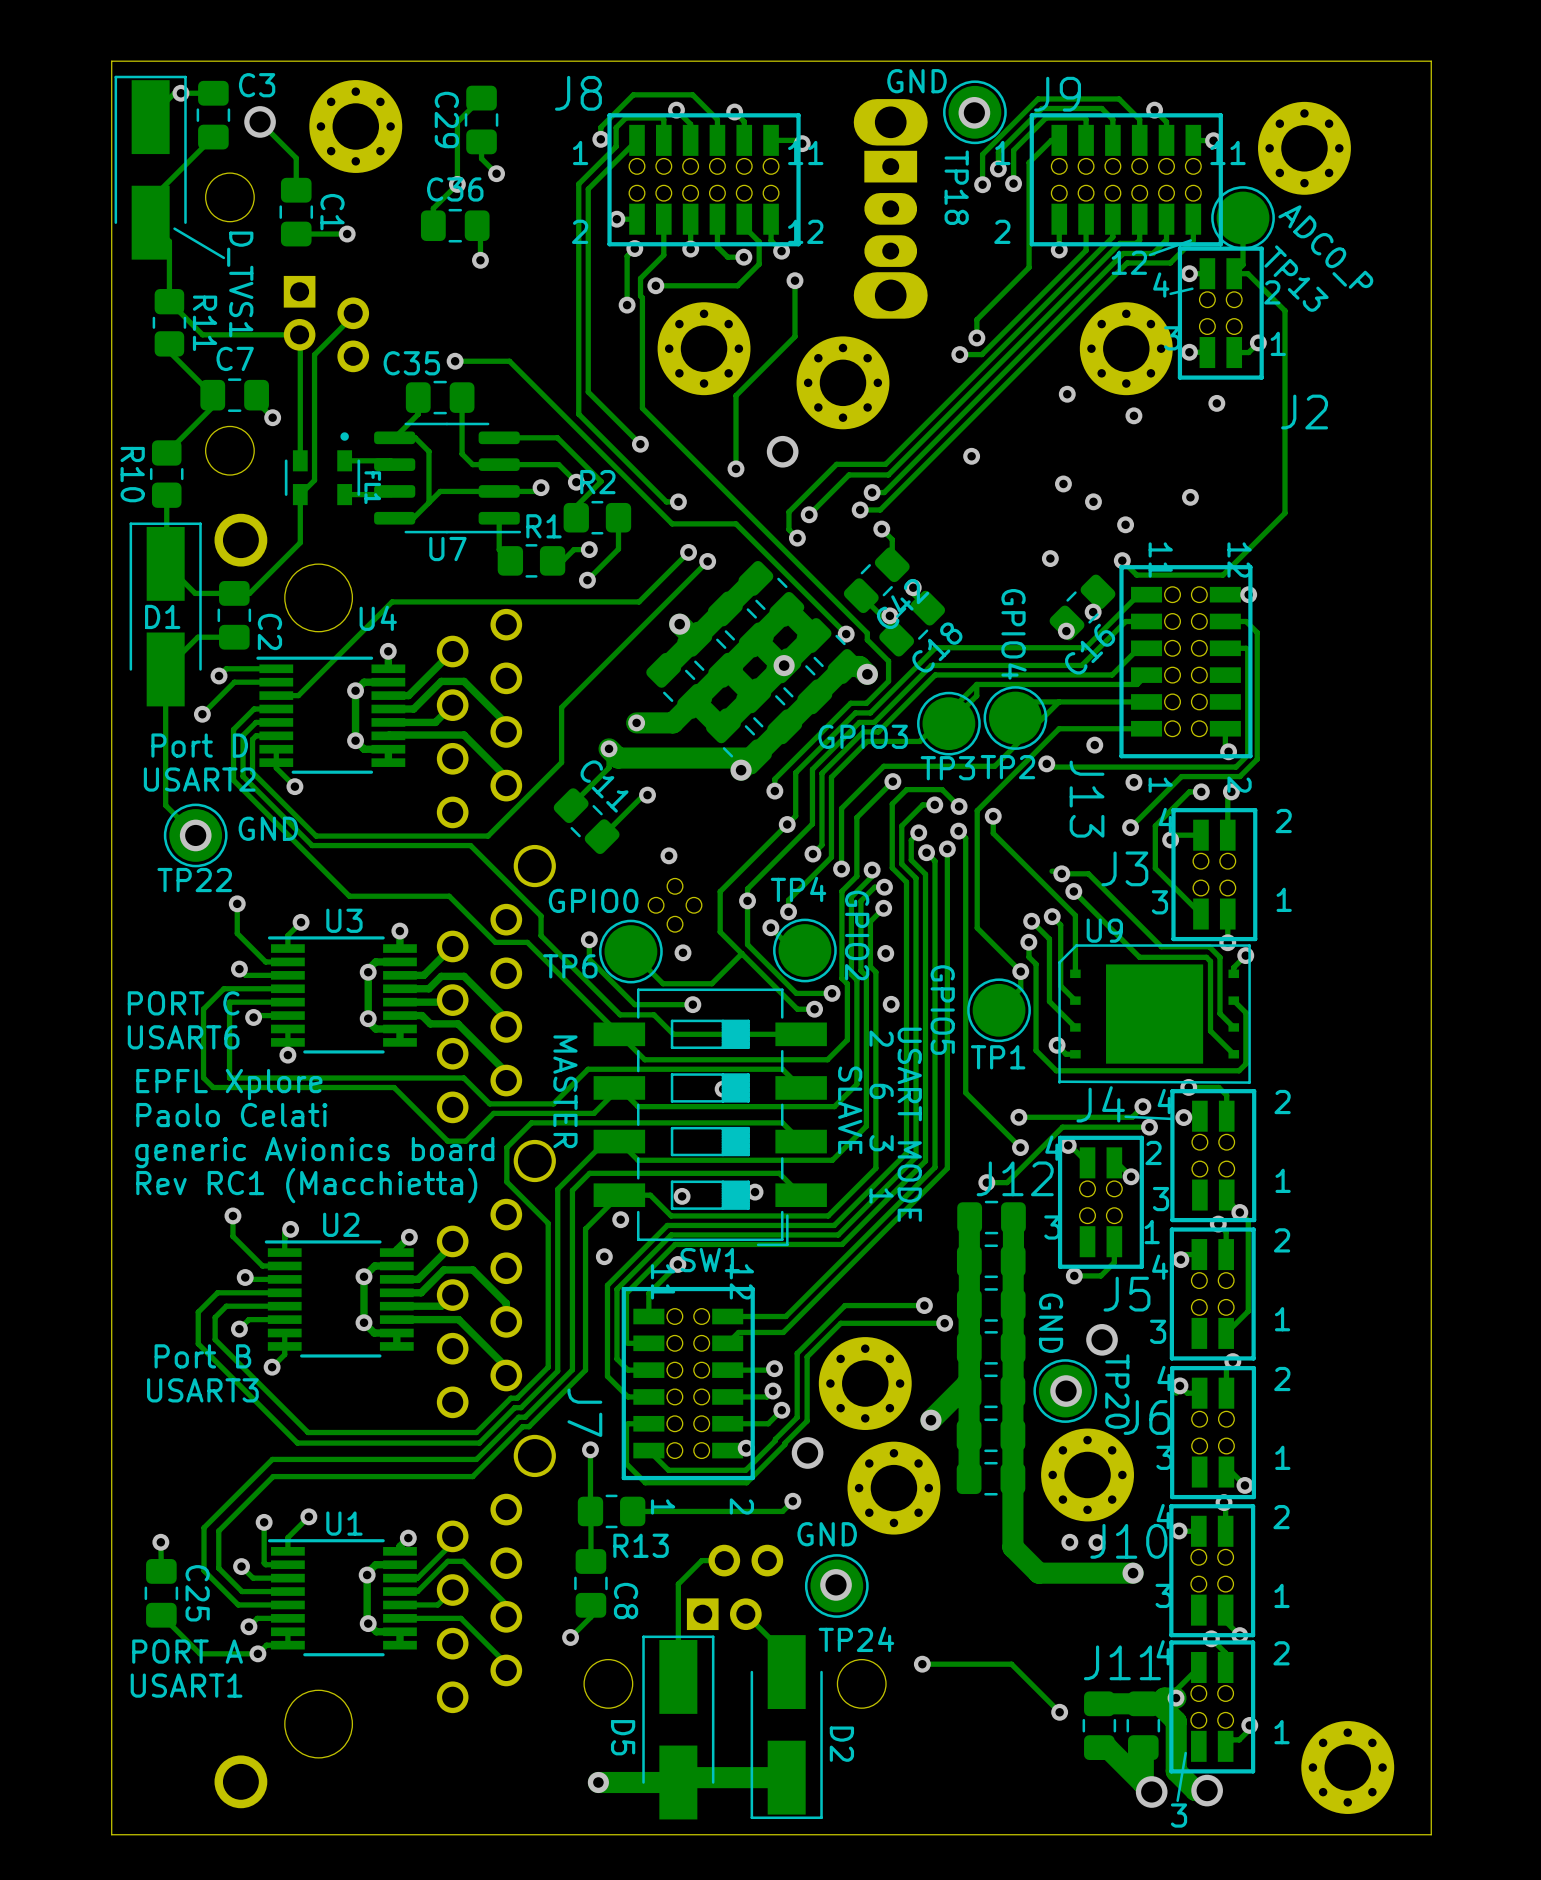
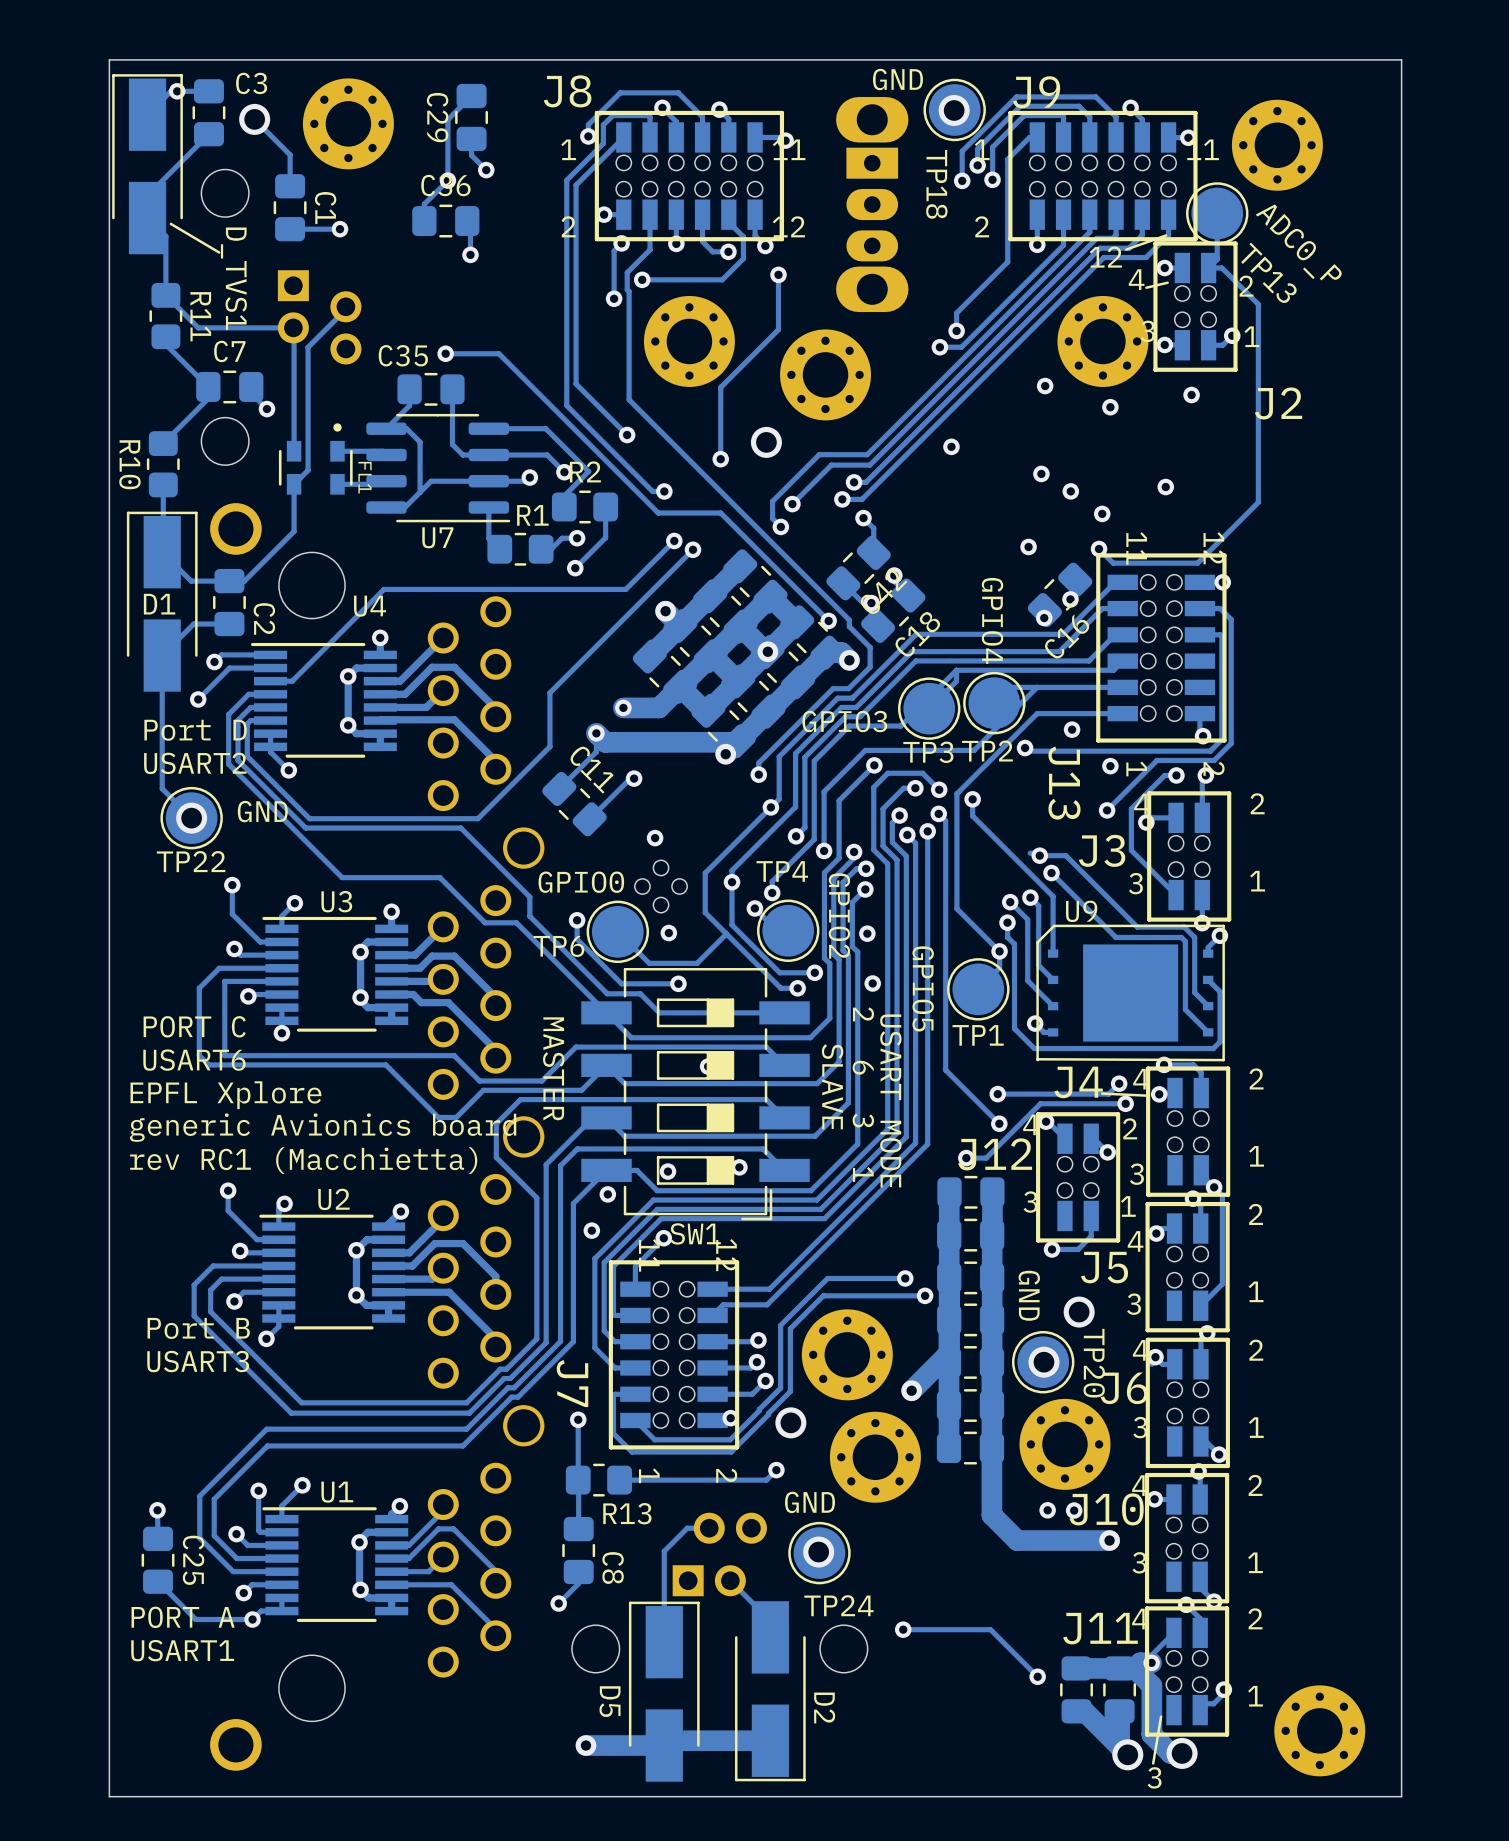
text: PORT C (183, 1003) -> none
text: USART6 (183, 1037) -> PORT C (194, 1026)
text: none -> USART6 (194, 1060)
text: EPFL Xplore (229, 1084) -> none
text: Paolo Celati (231, 1115) -> EPFL Xplore (225, 1095)
text: Rev RC1 (Macchietta) (306, 1185) -> rev RC1 (Macchietta) (303, 1160)

